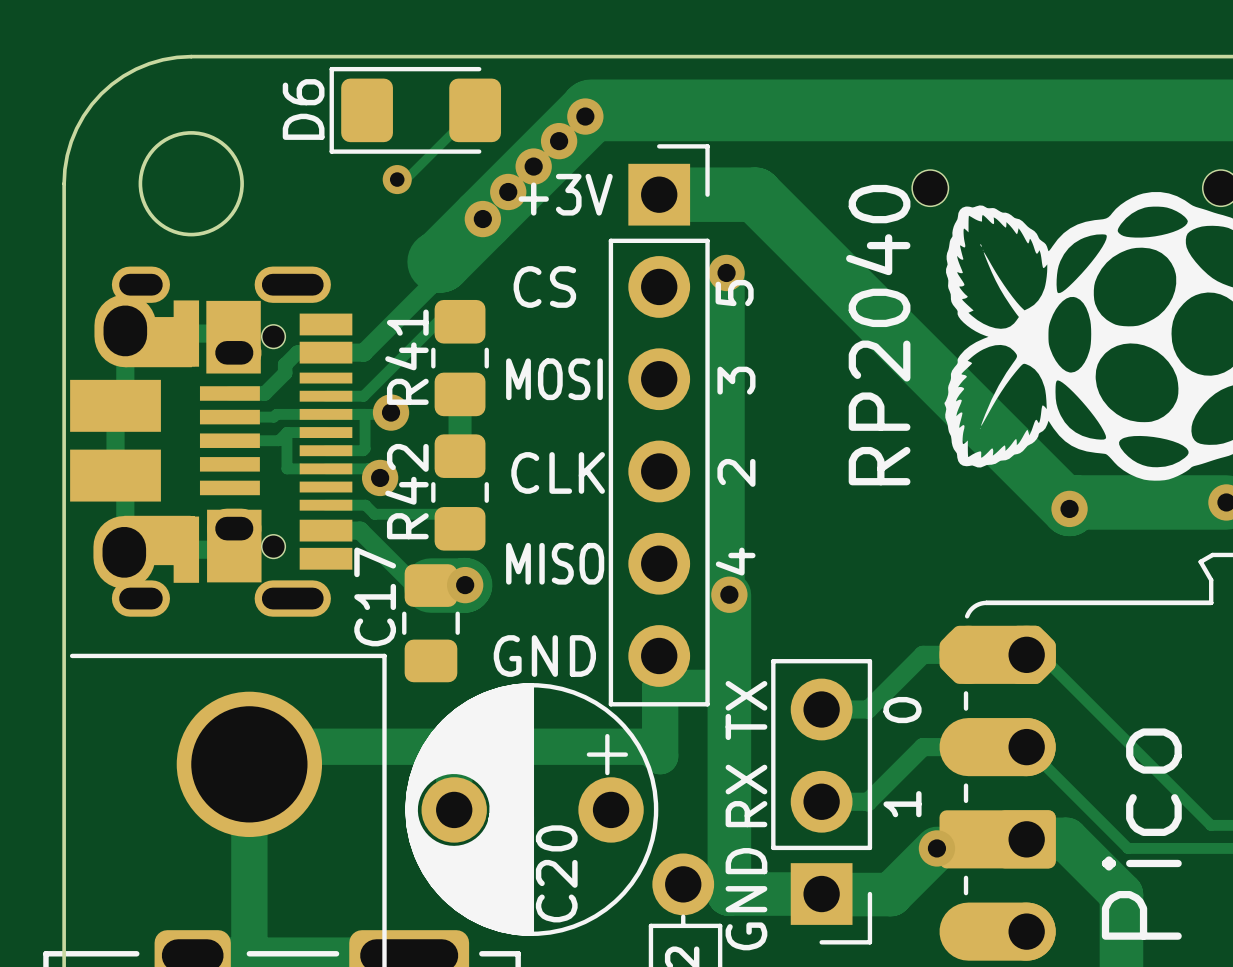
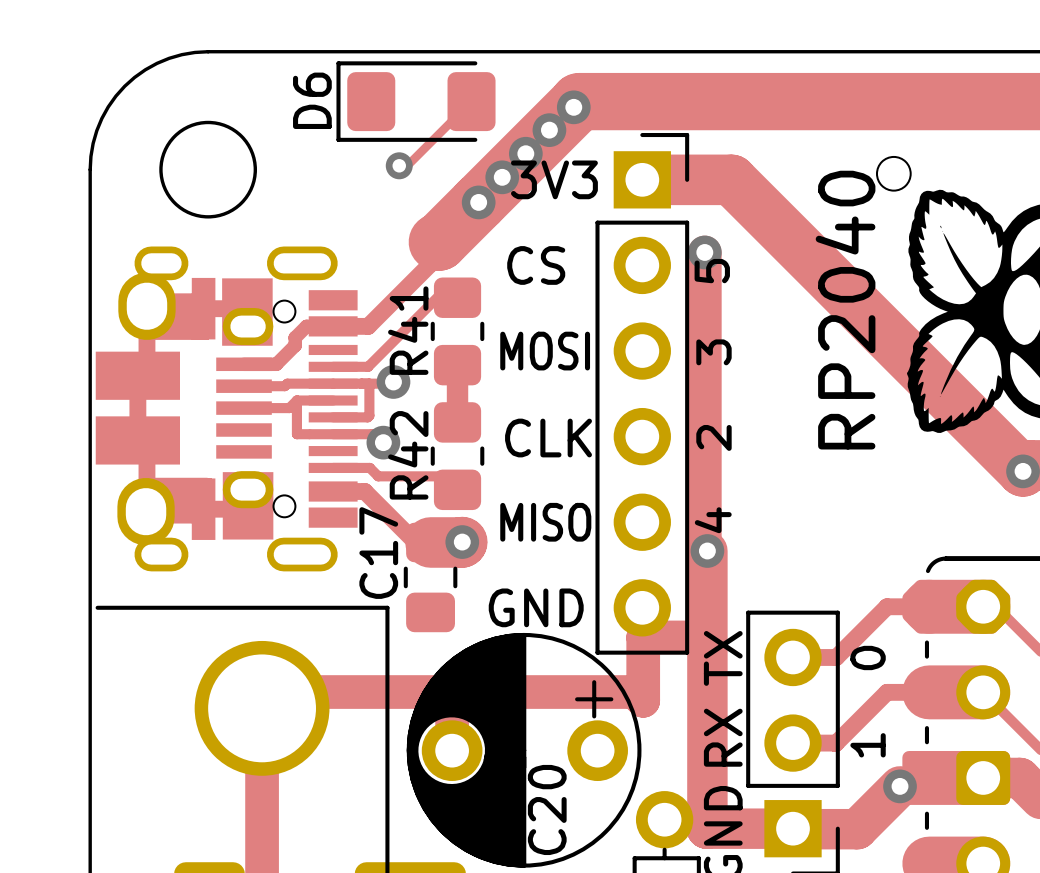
text: +3V (565, 194) -> 3V3 (554, 179)

